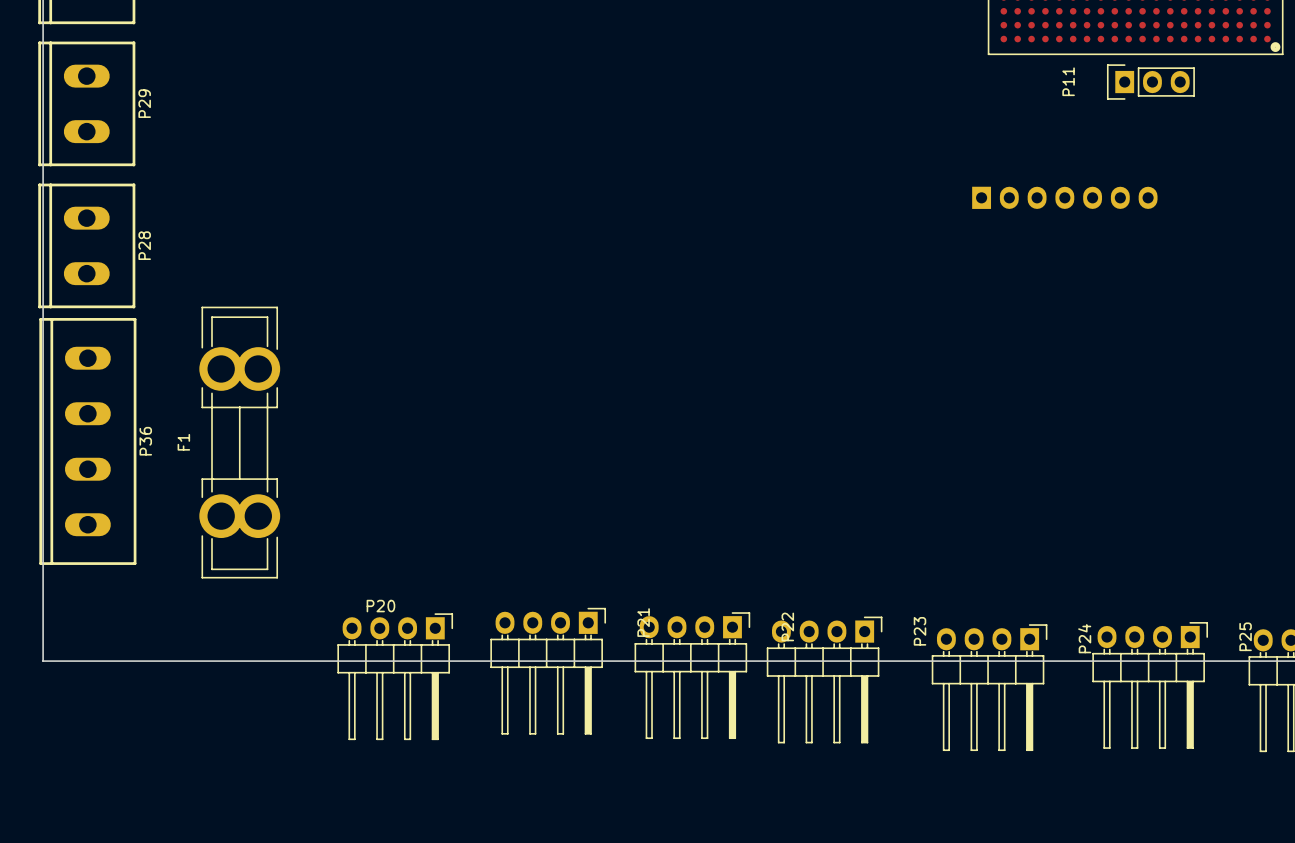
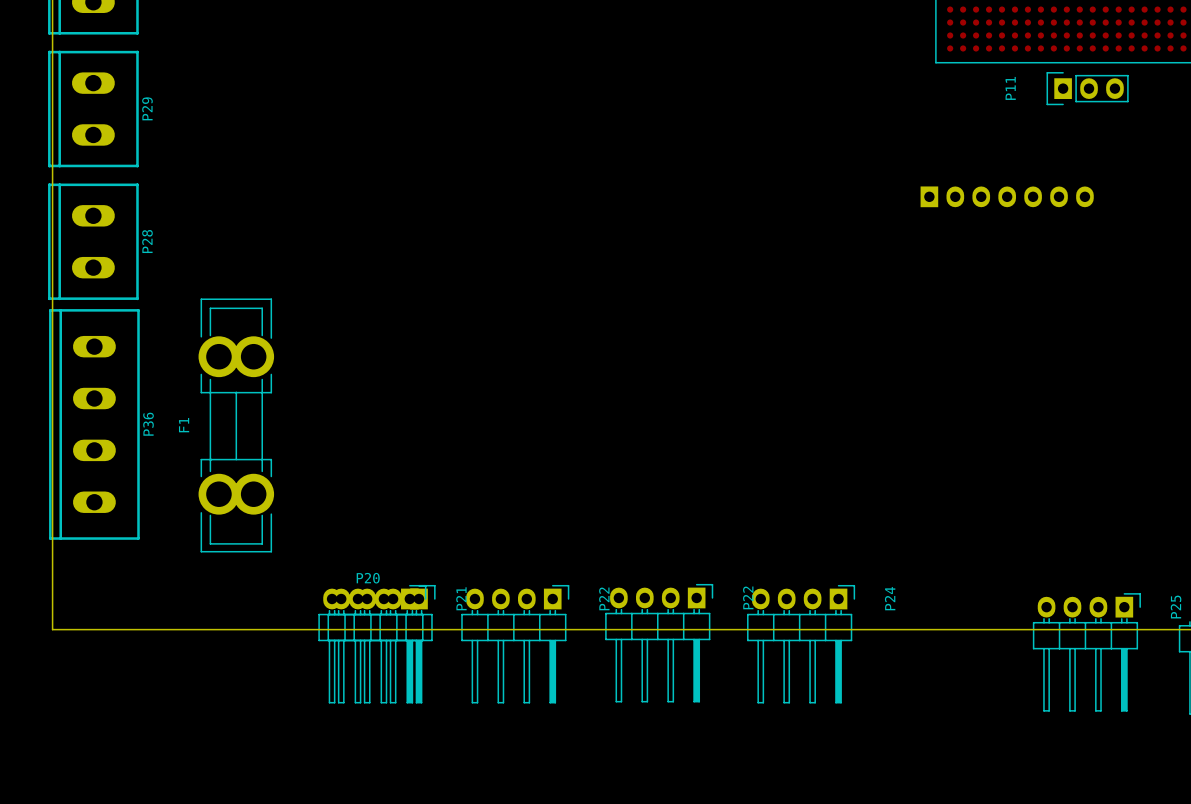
P21 position: (548, 671) -> (372, 644)
P22: none -> (515, 644)
P23: (824, 679) -> none
P24 position: (989, 687) -> (801, 644)

